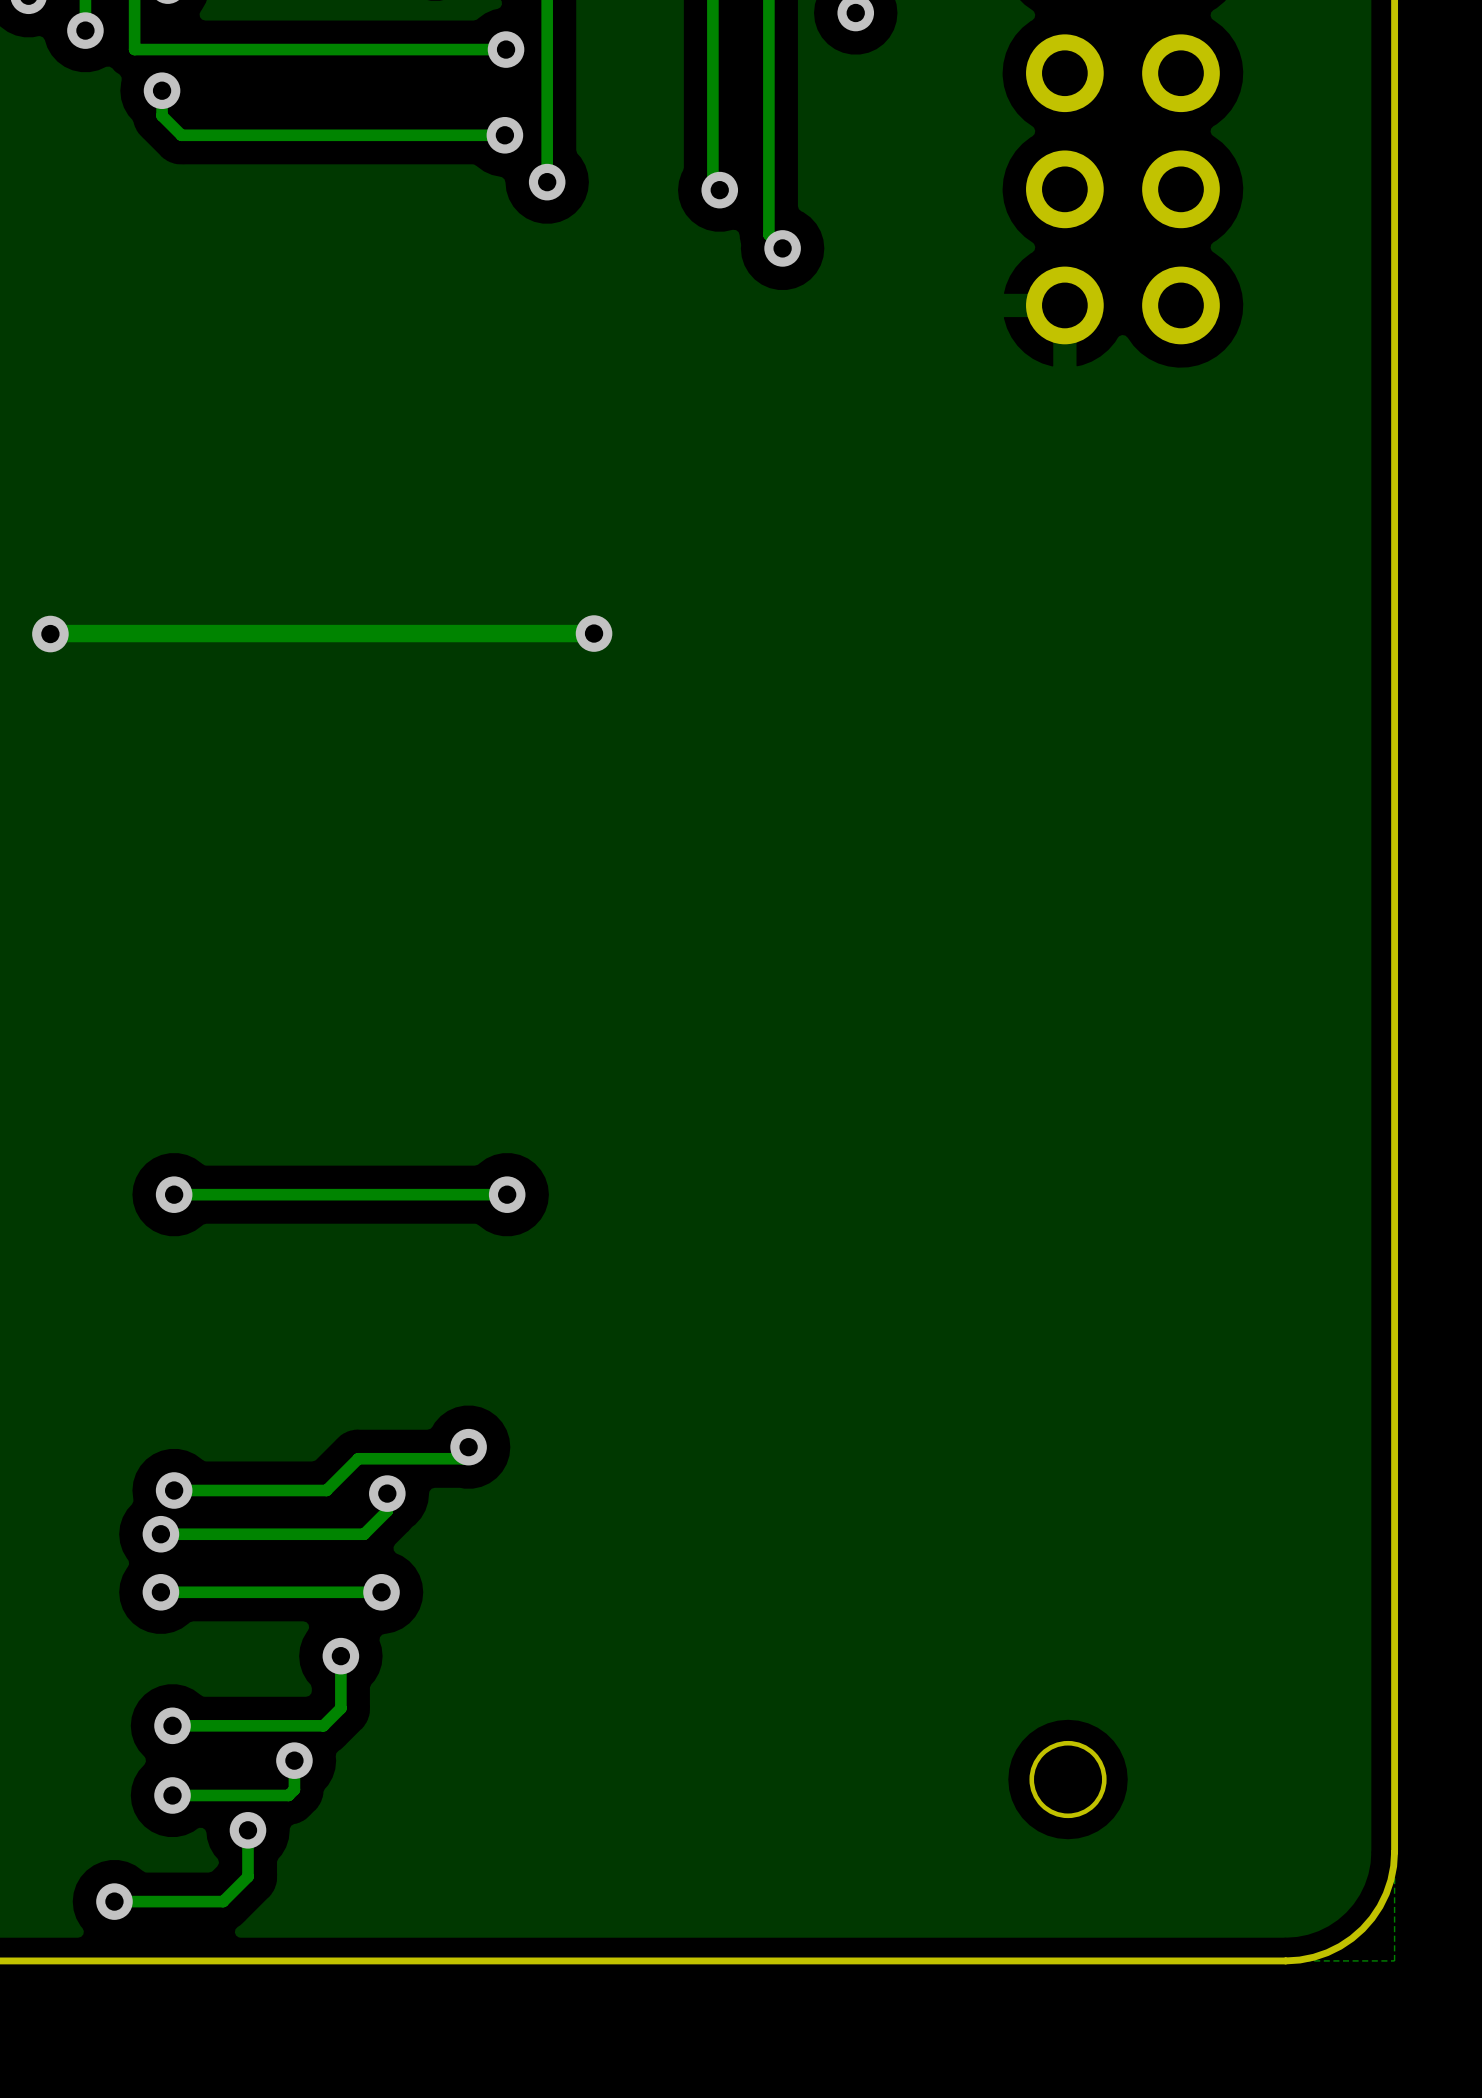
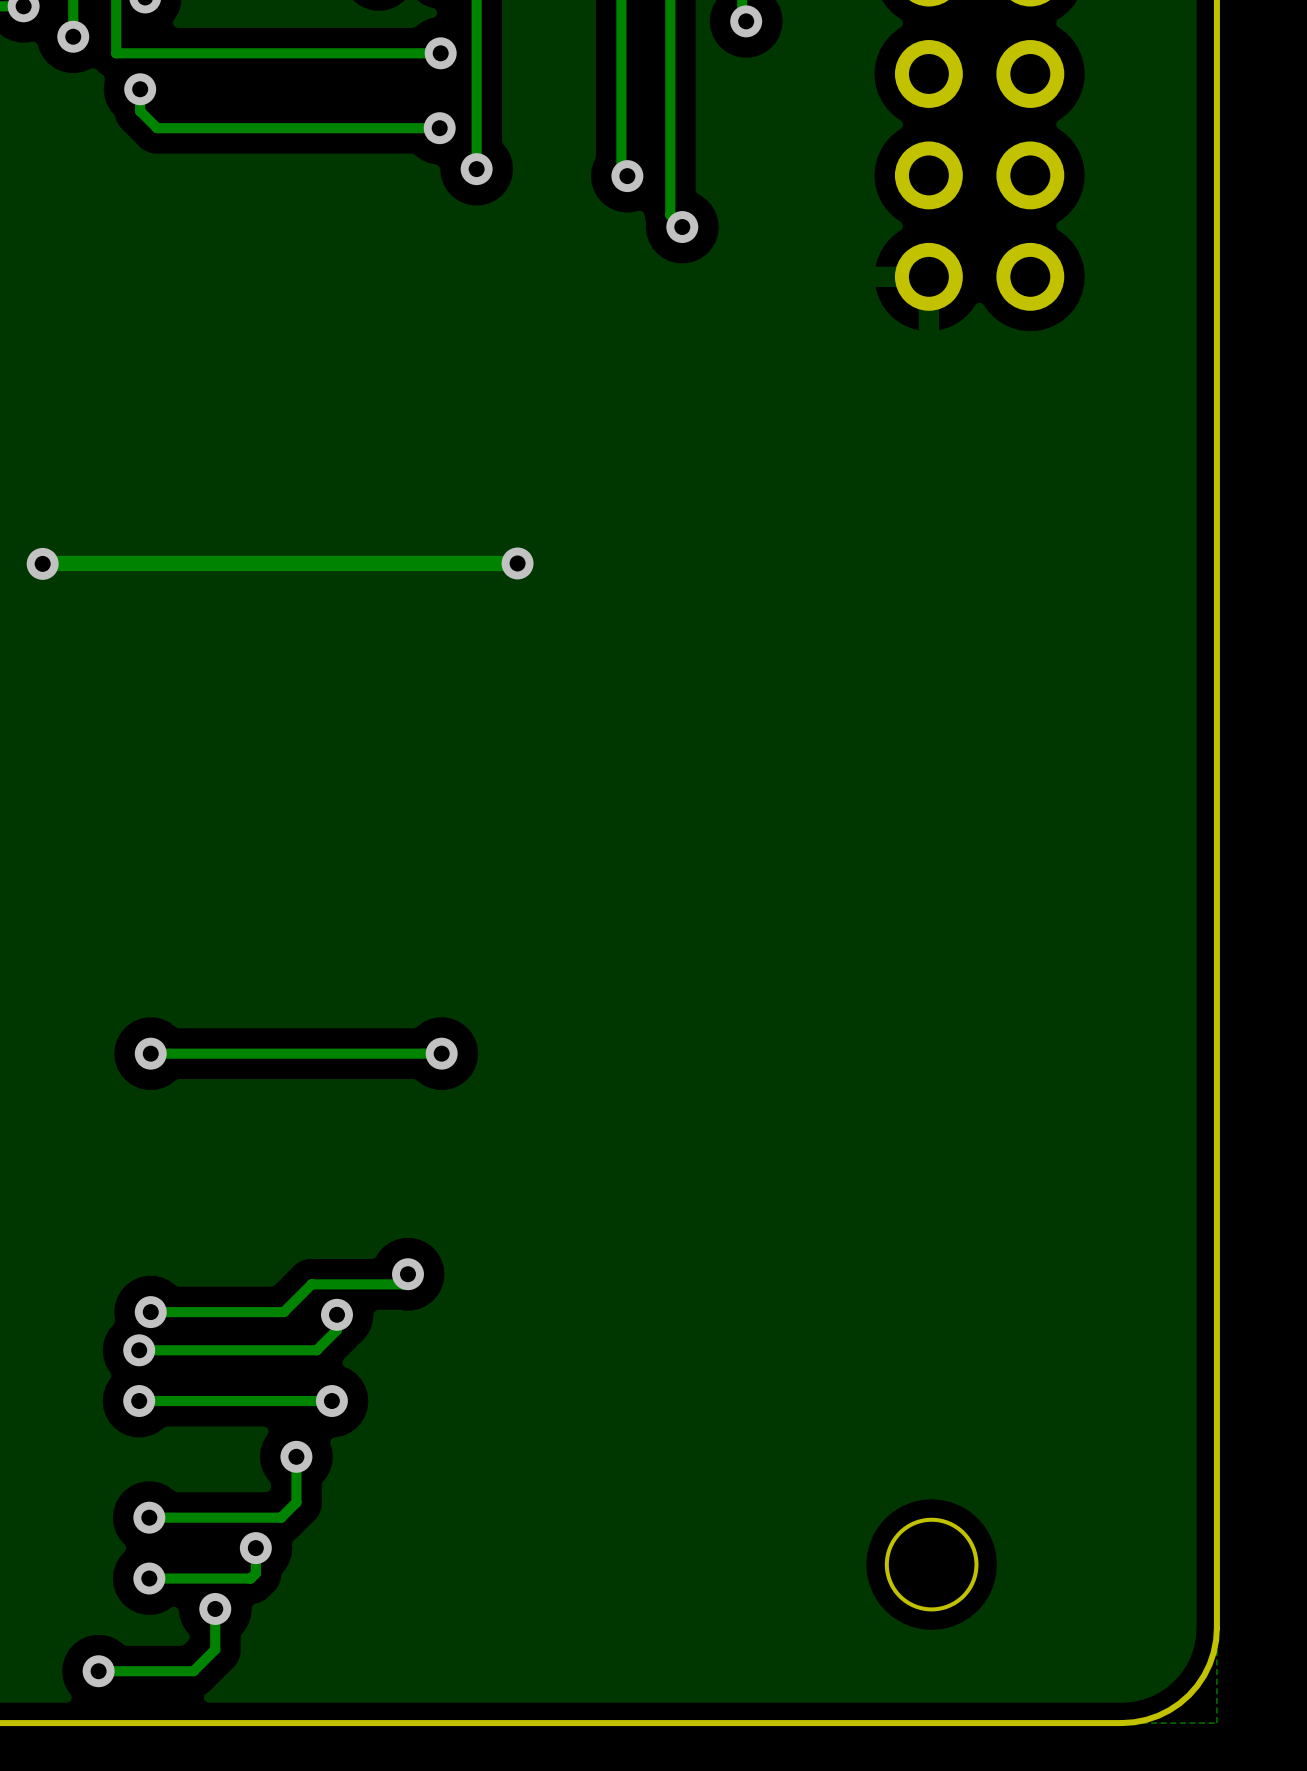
round board edge size: [1029, 1740, 1107, 1819] -> [884, 1517, 979, 1612]

